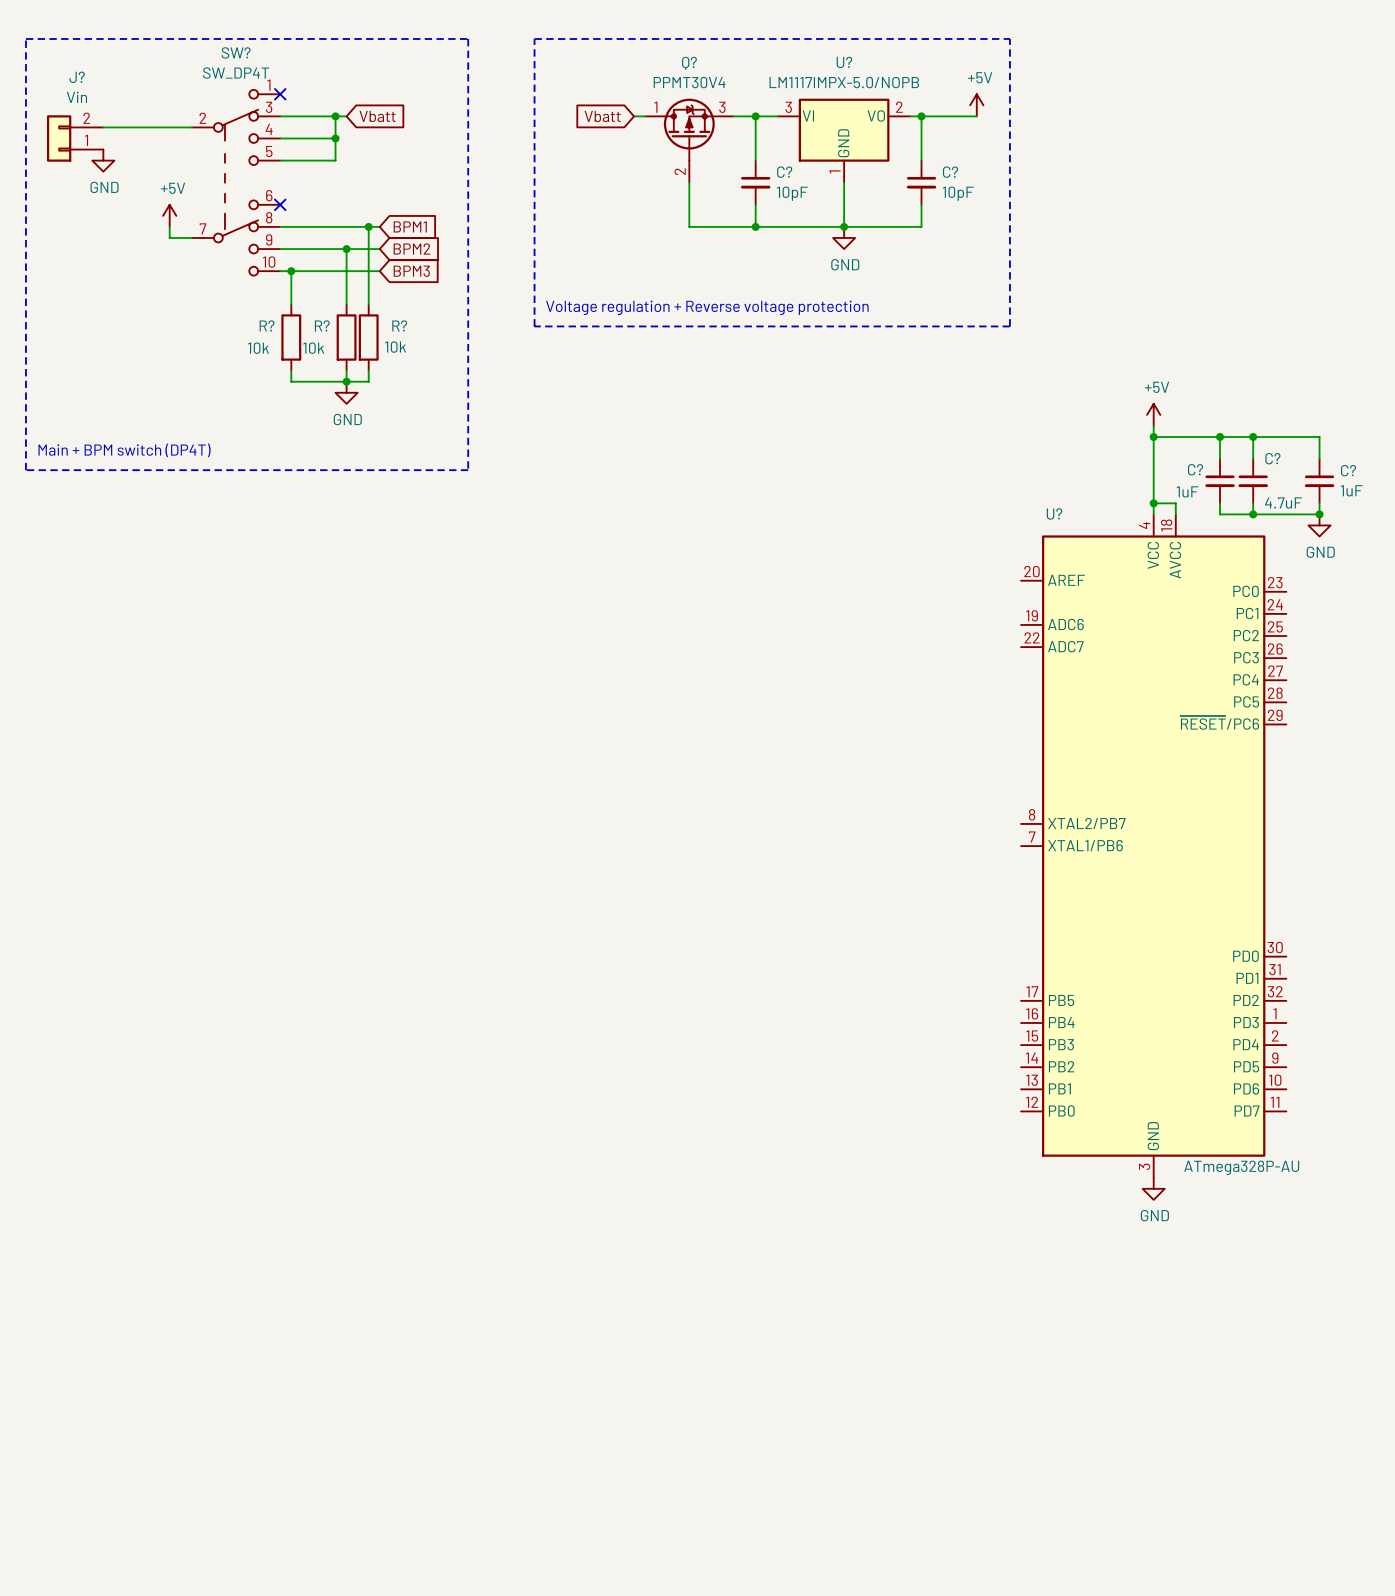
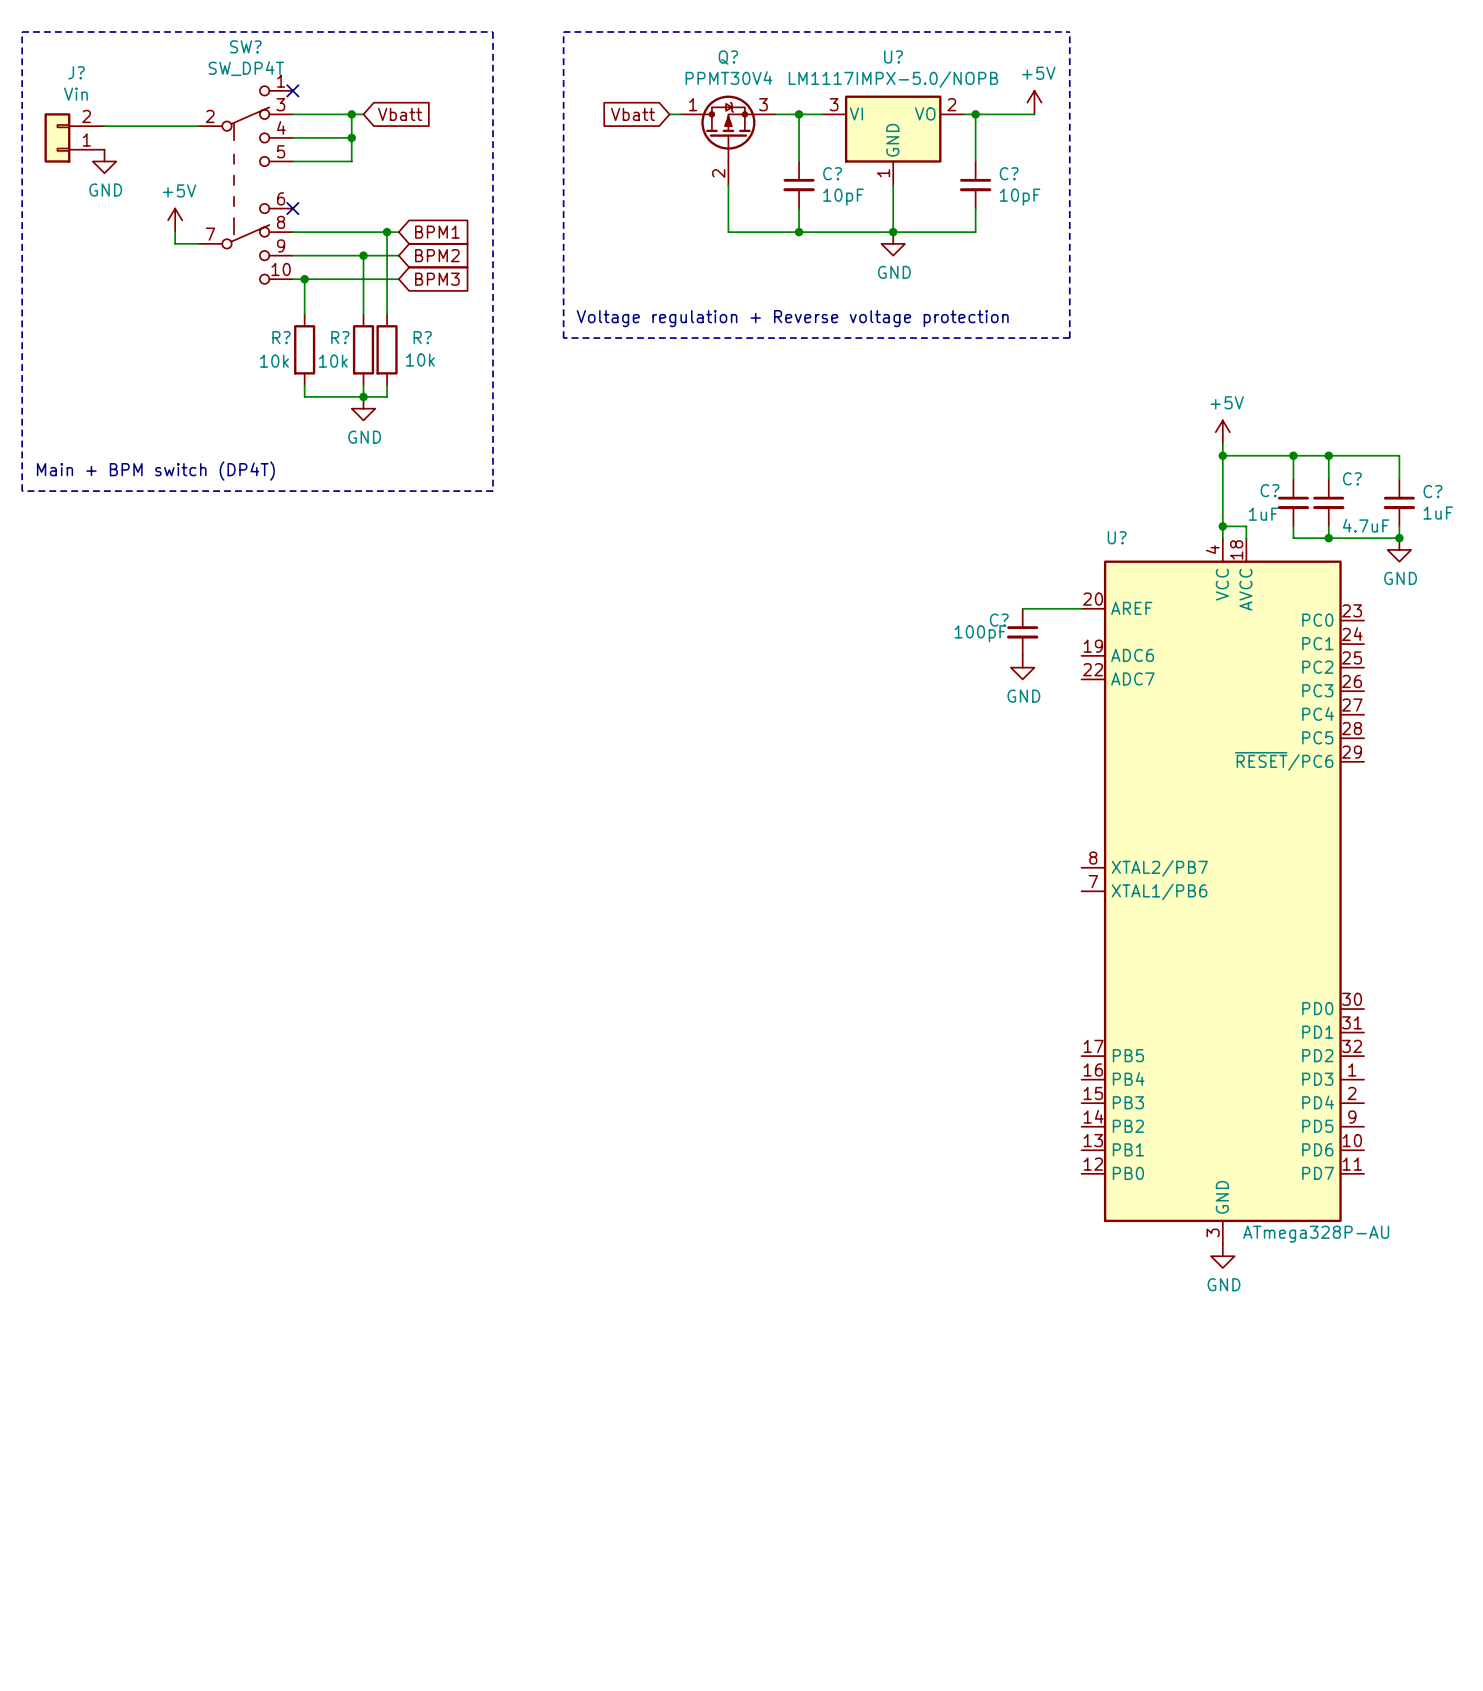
wire: none -> (1022, 608) (1081, 608)
C?: none -> 100pF (1022, 632)
power symbol: none -> GND (1022, 667)

